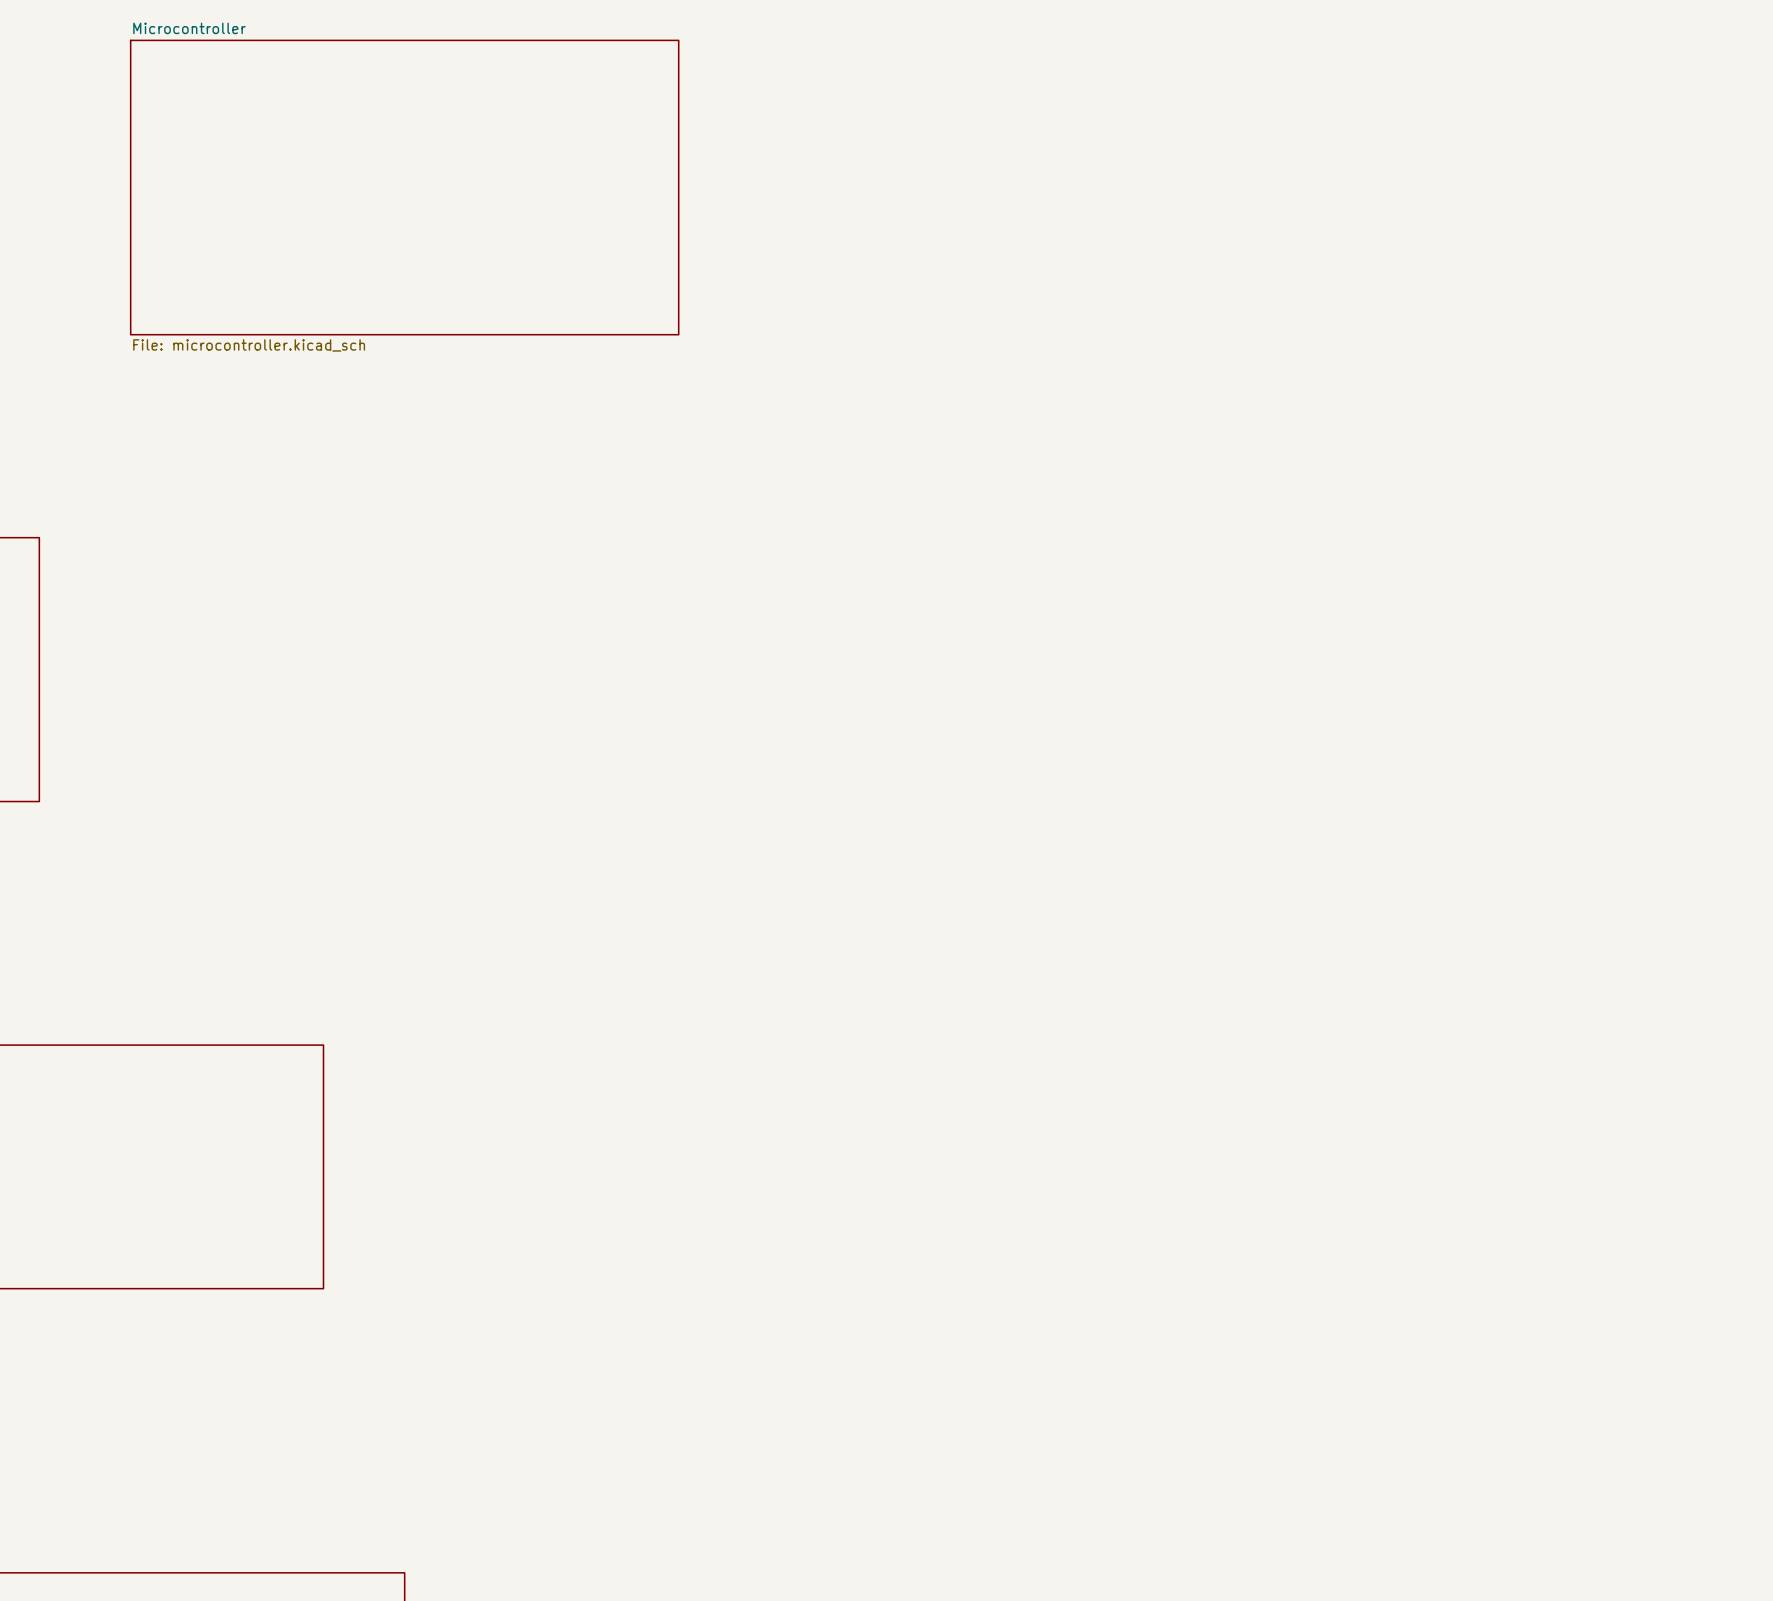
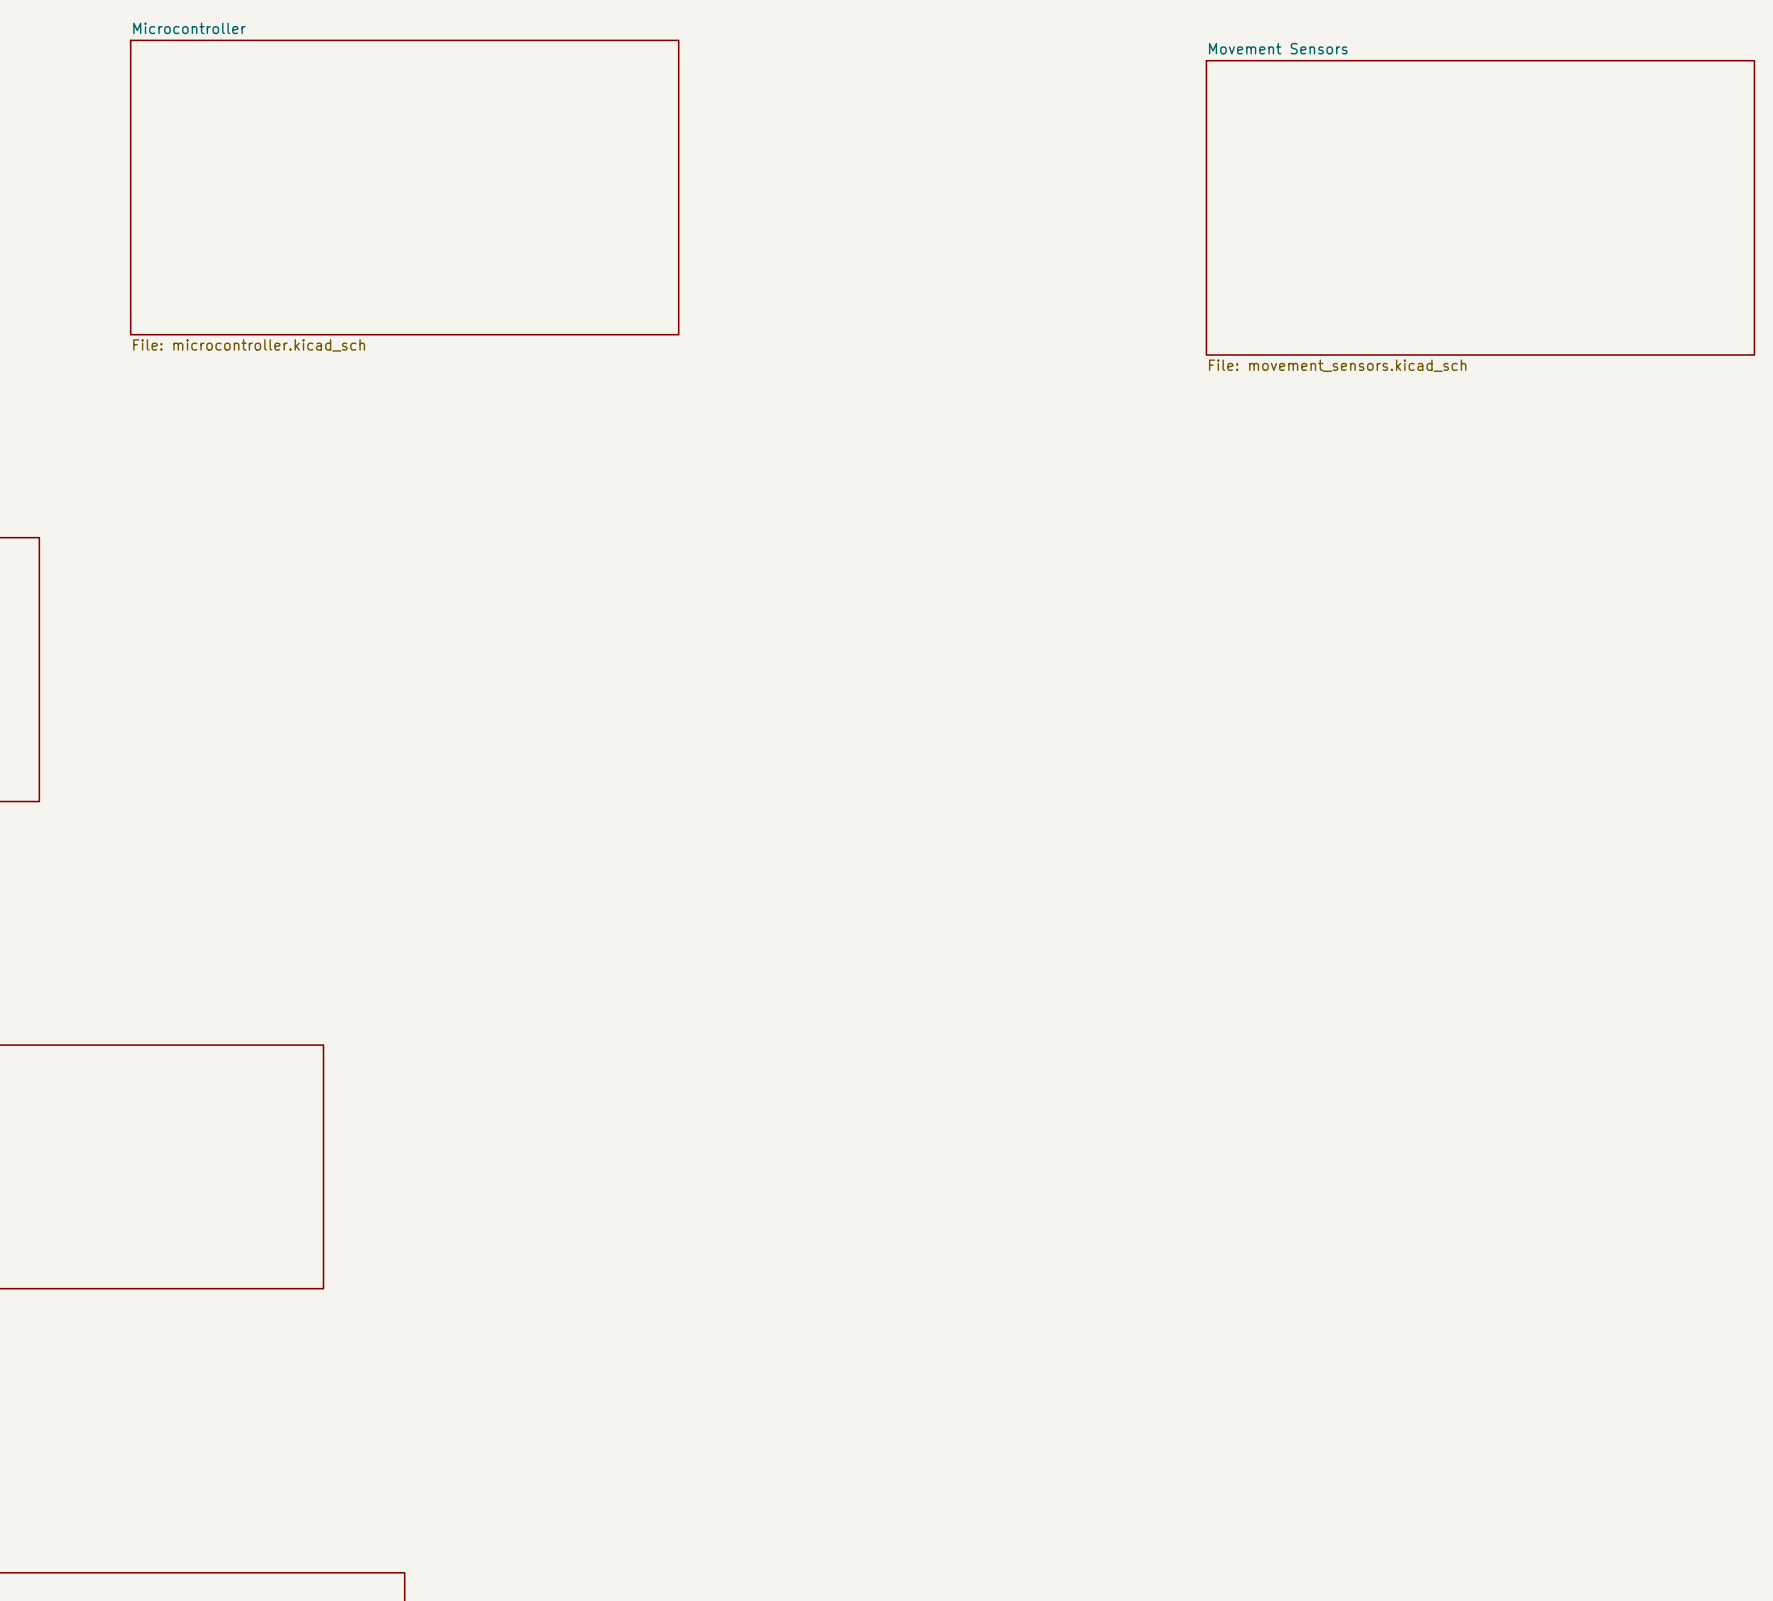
sheet Movement Sensors: none -> File: movement_sensors.kicad_sch (1480, 207)

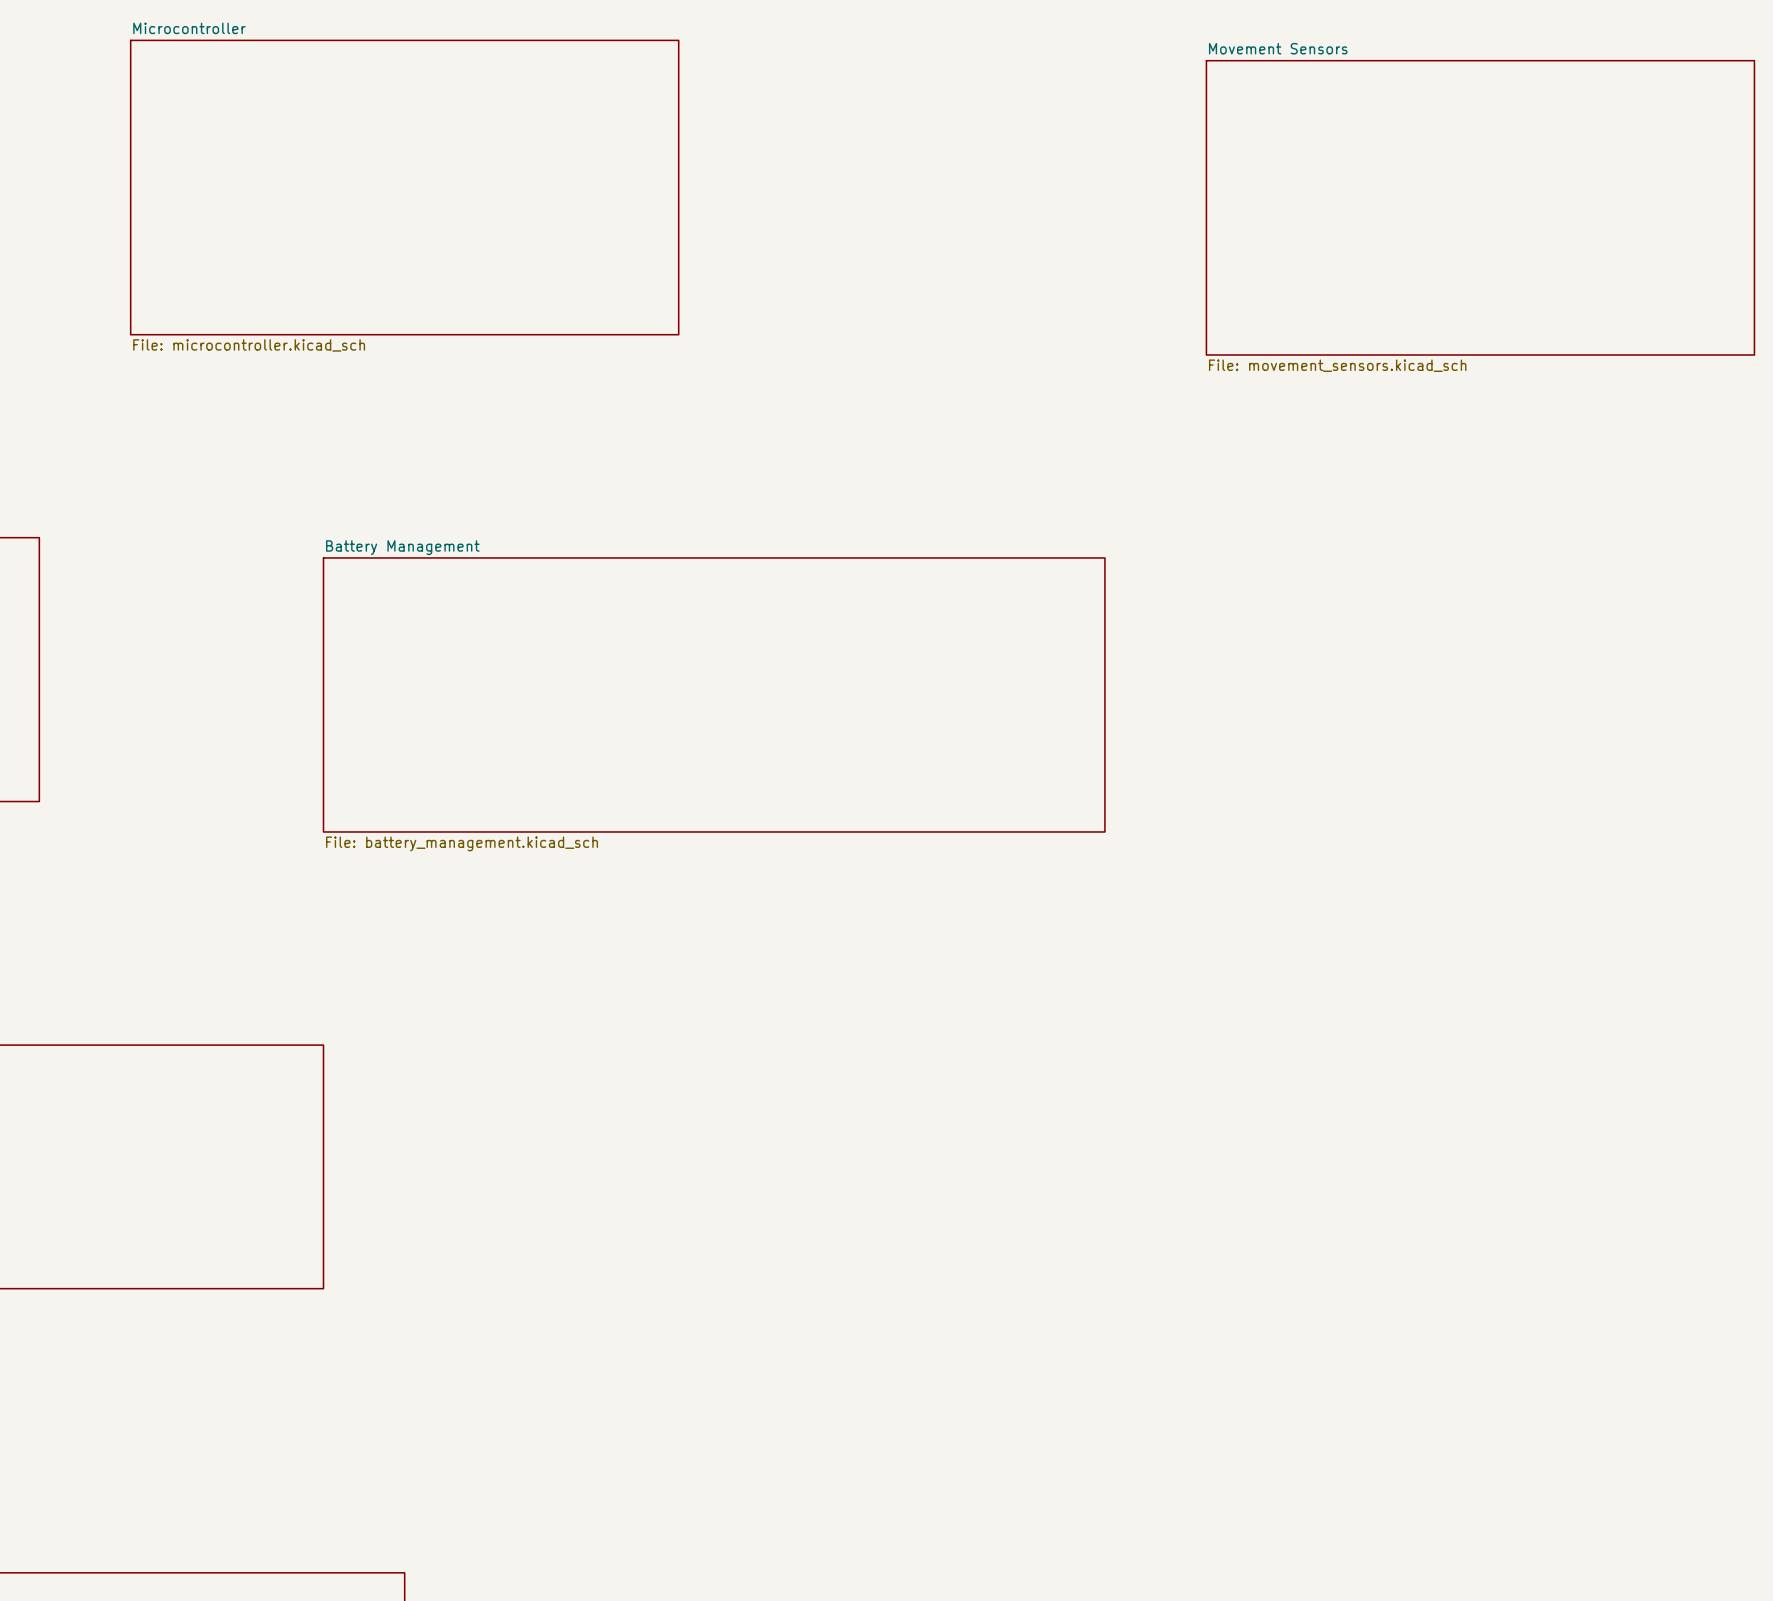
sheet Battery Management: none -> File: battery_management.kicad_sch (714, 694)

